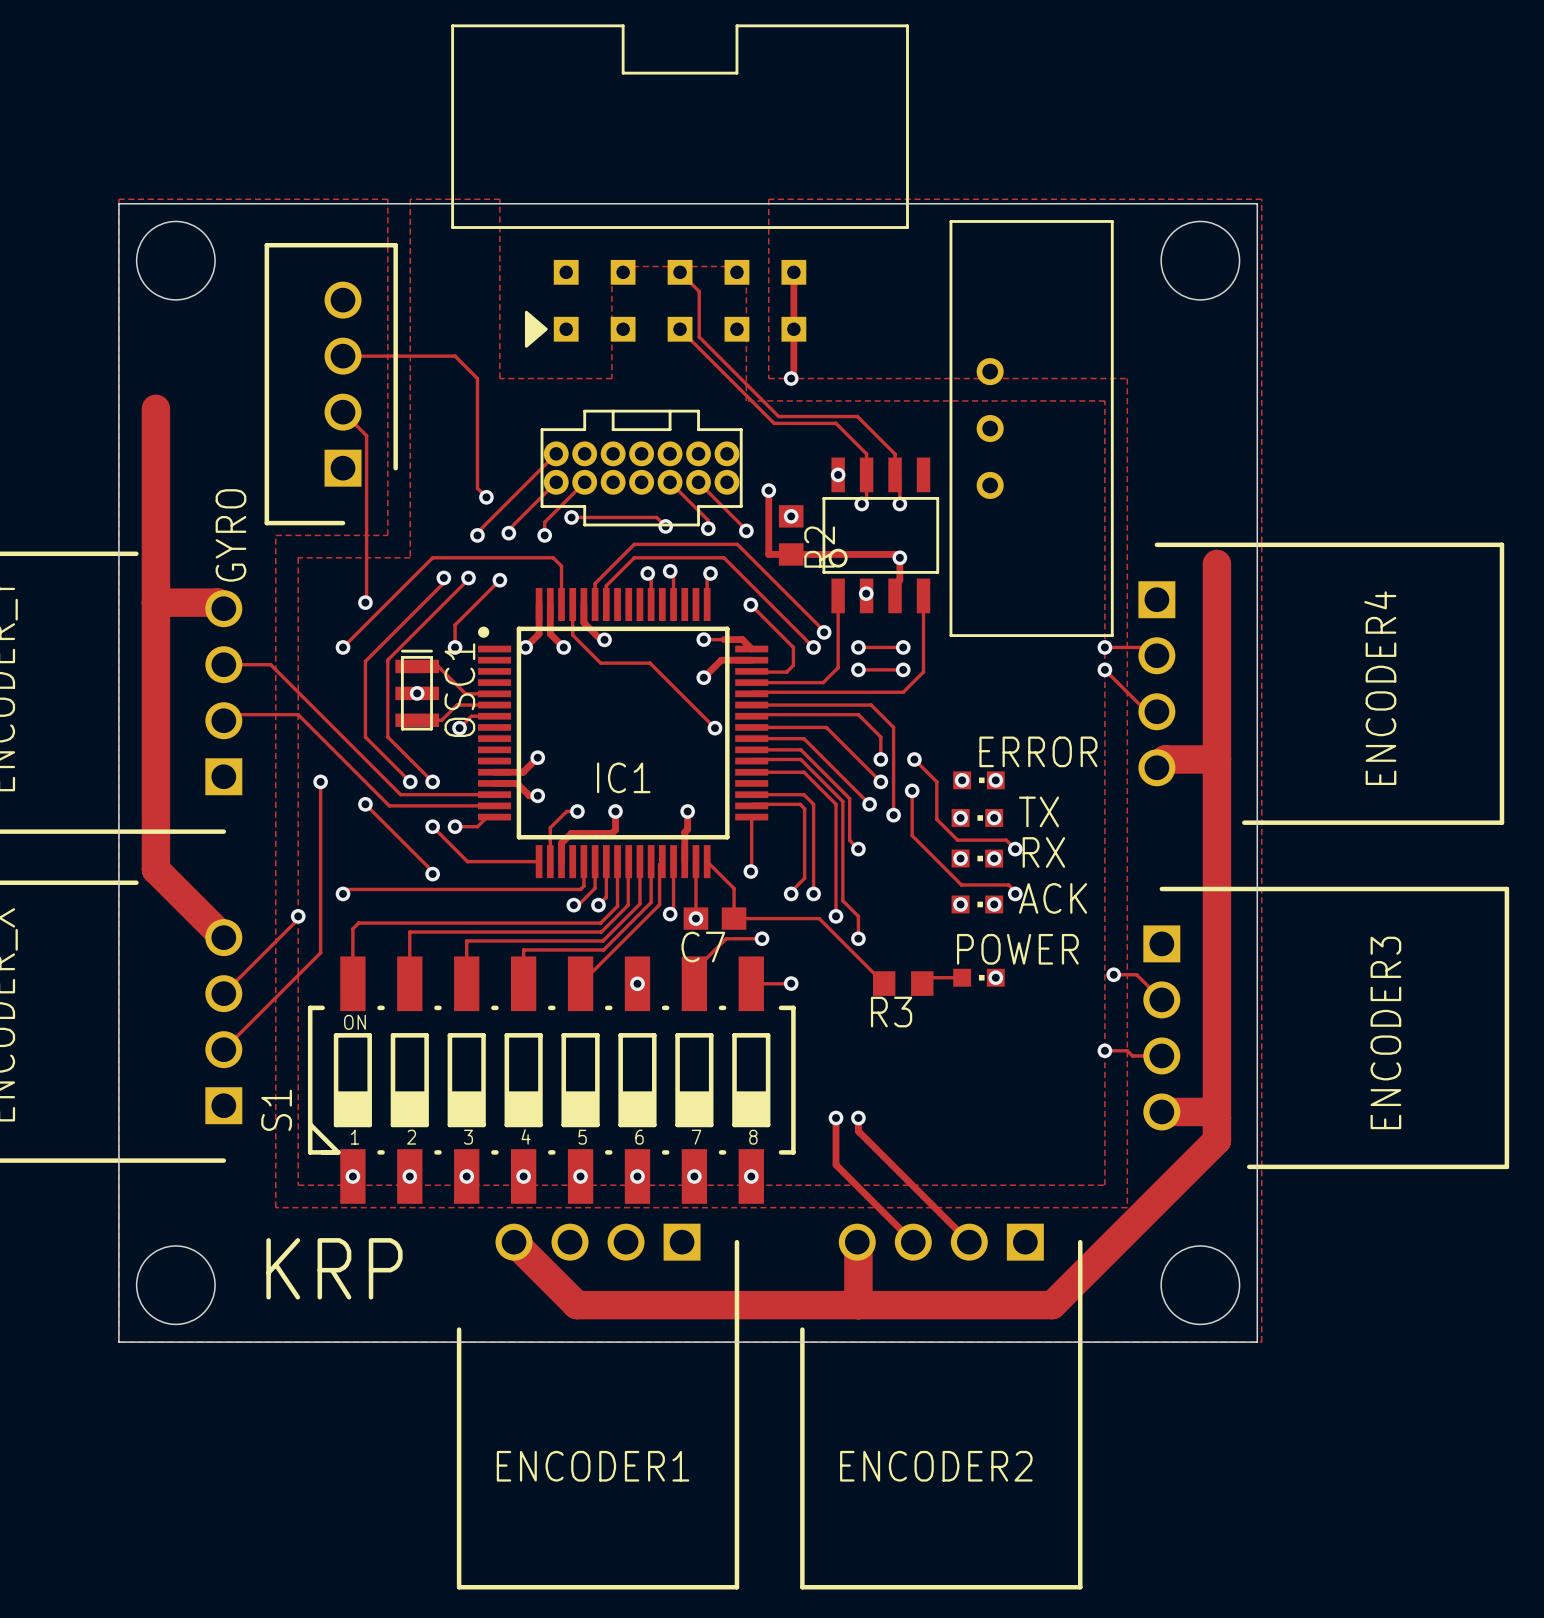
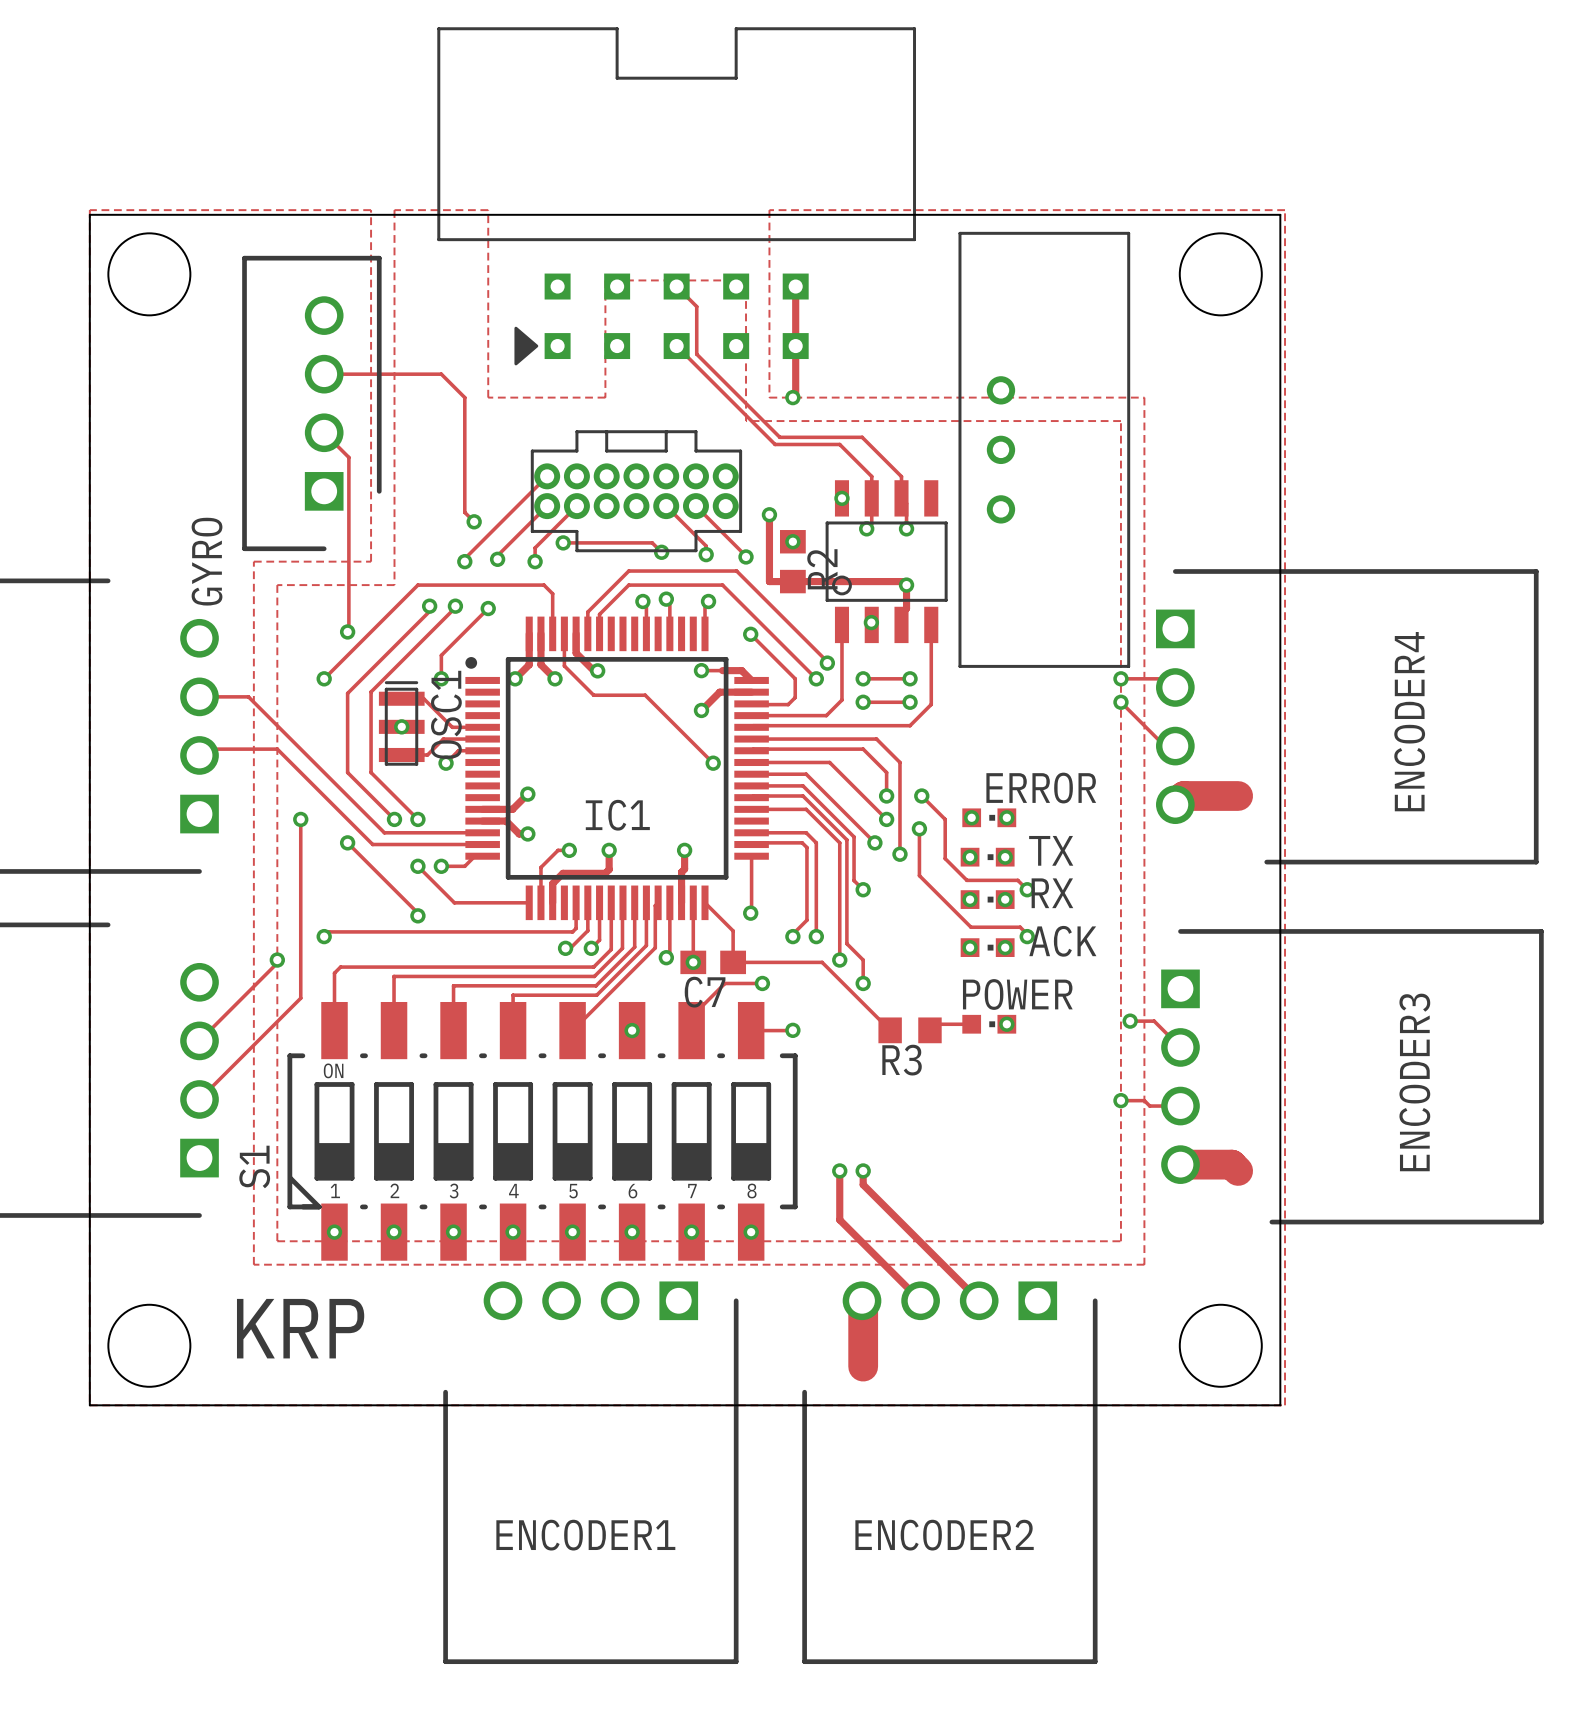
track: (155, 408) (155, 869) (223, 937) -> none
track: (1216, 563) (1216, 1140) (1052, 1305) (576, 1305) (514, 1242) -> none
track: (155, 602) (217, 602) (223, 608) -> none

